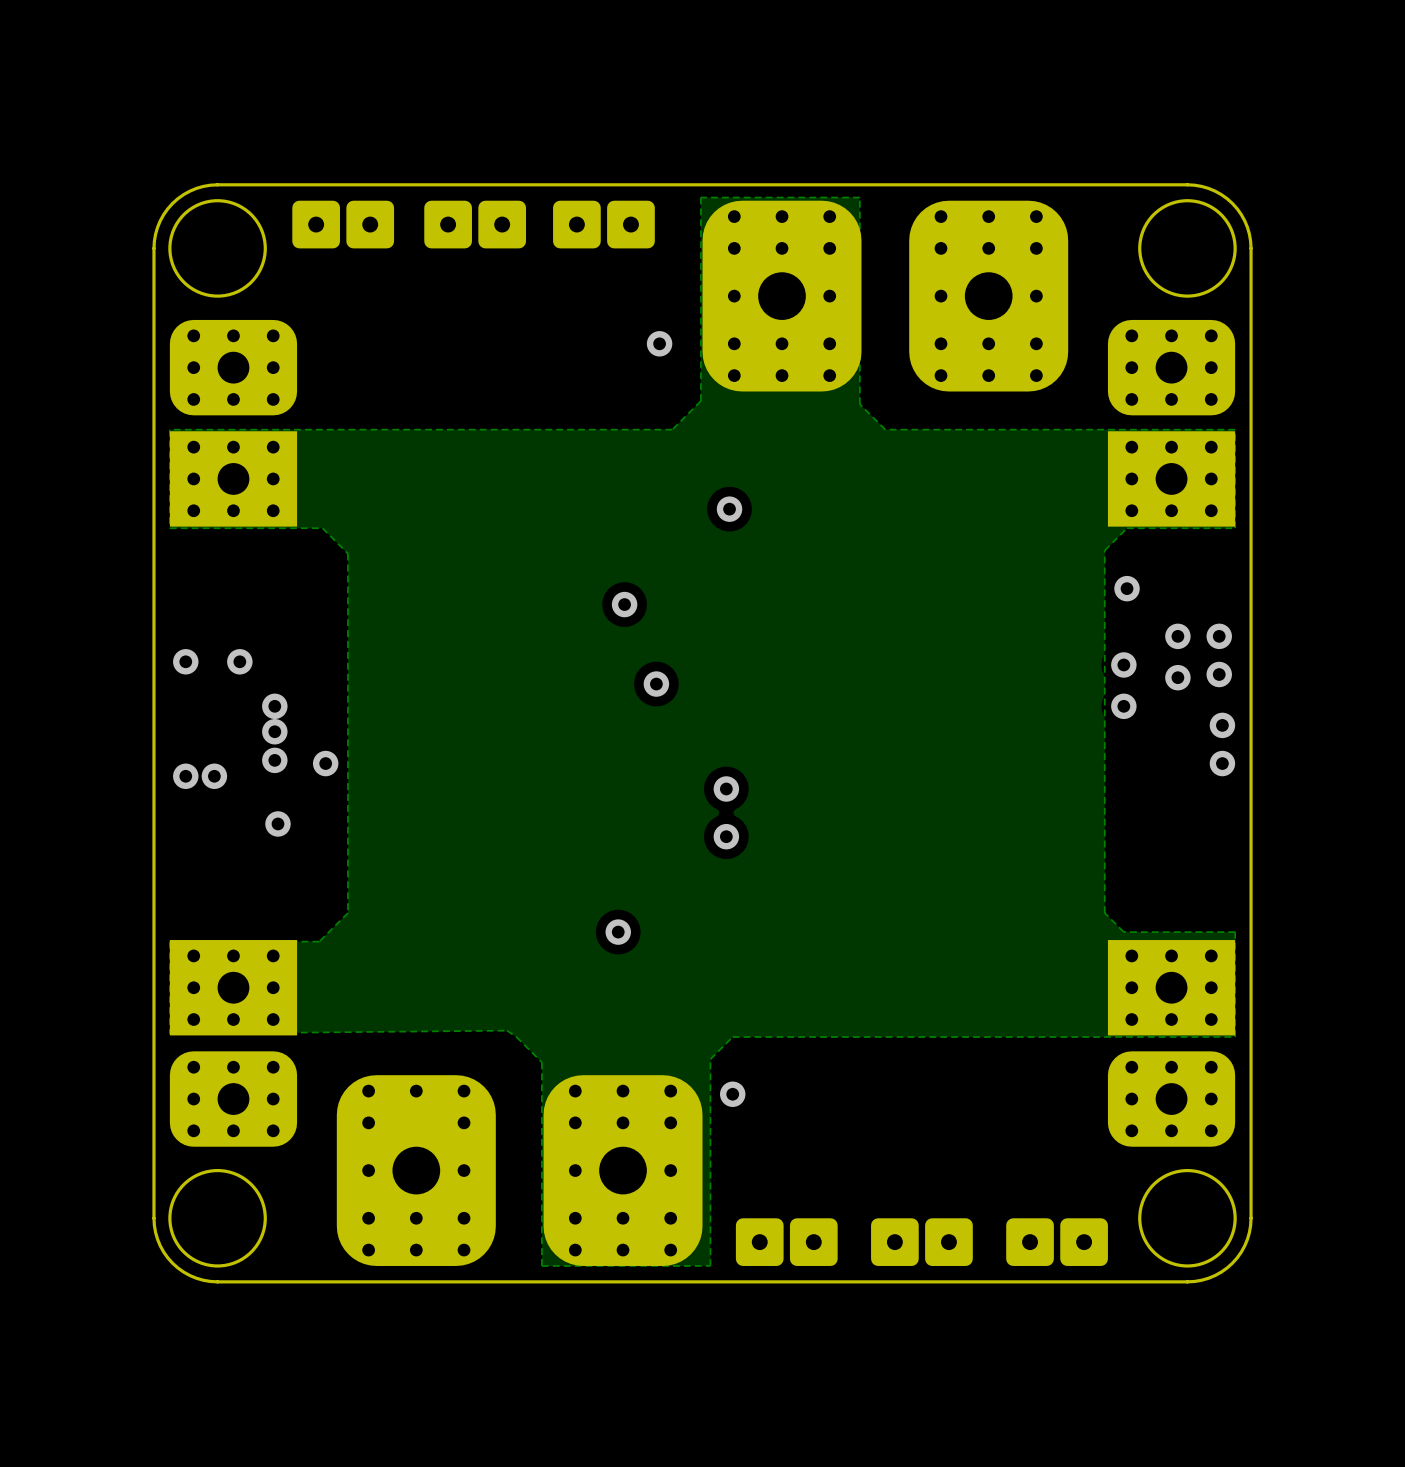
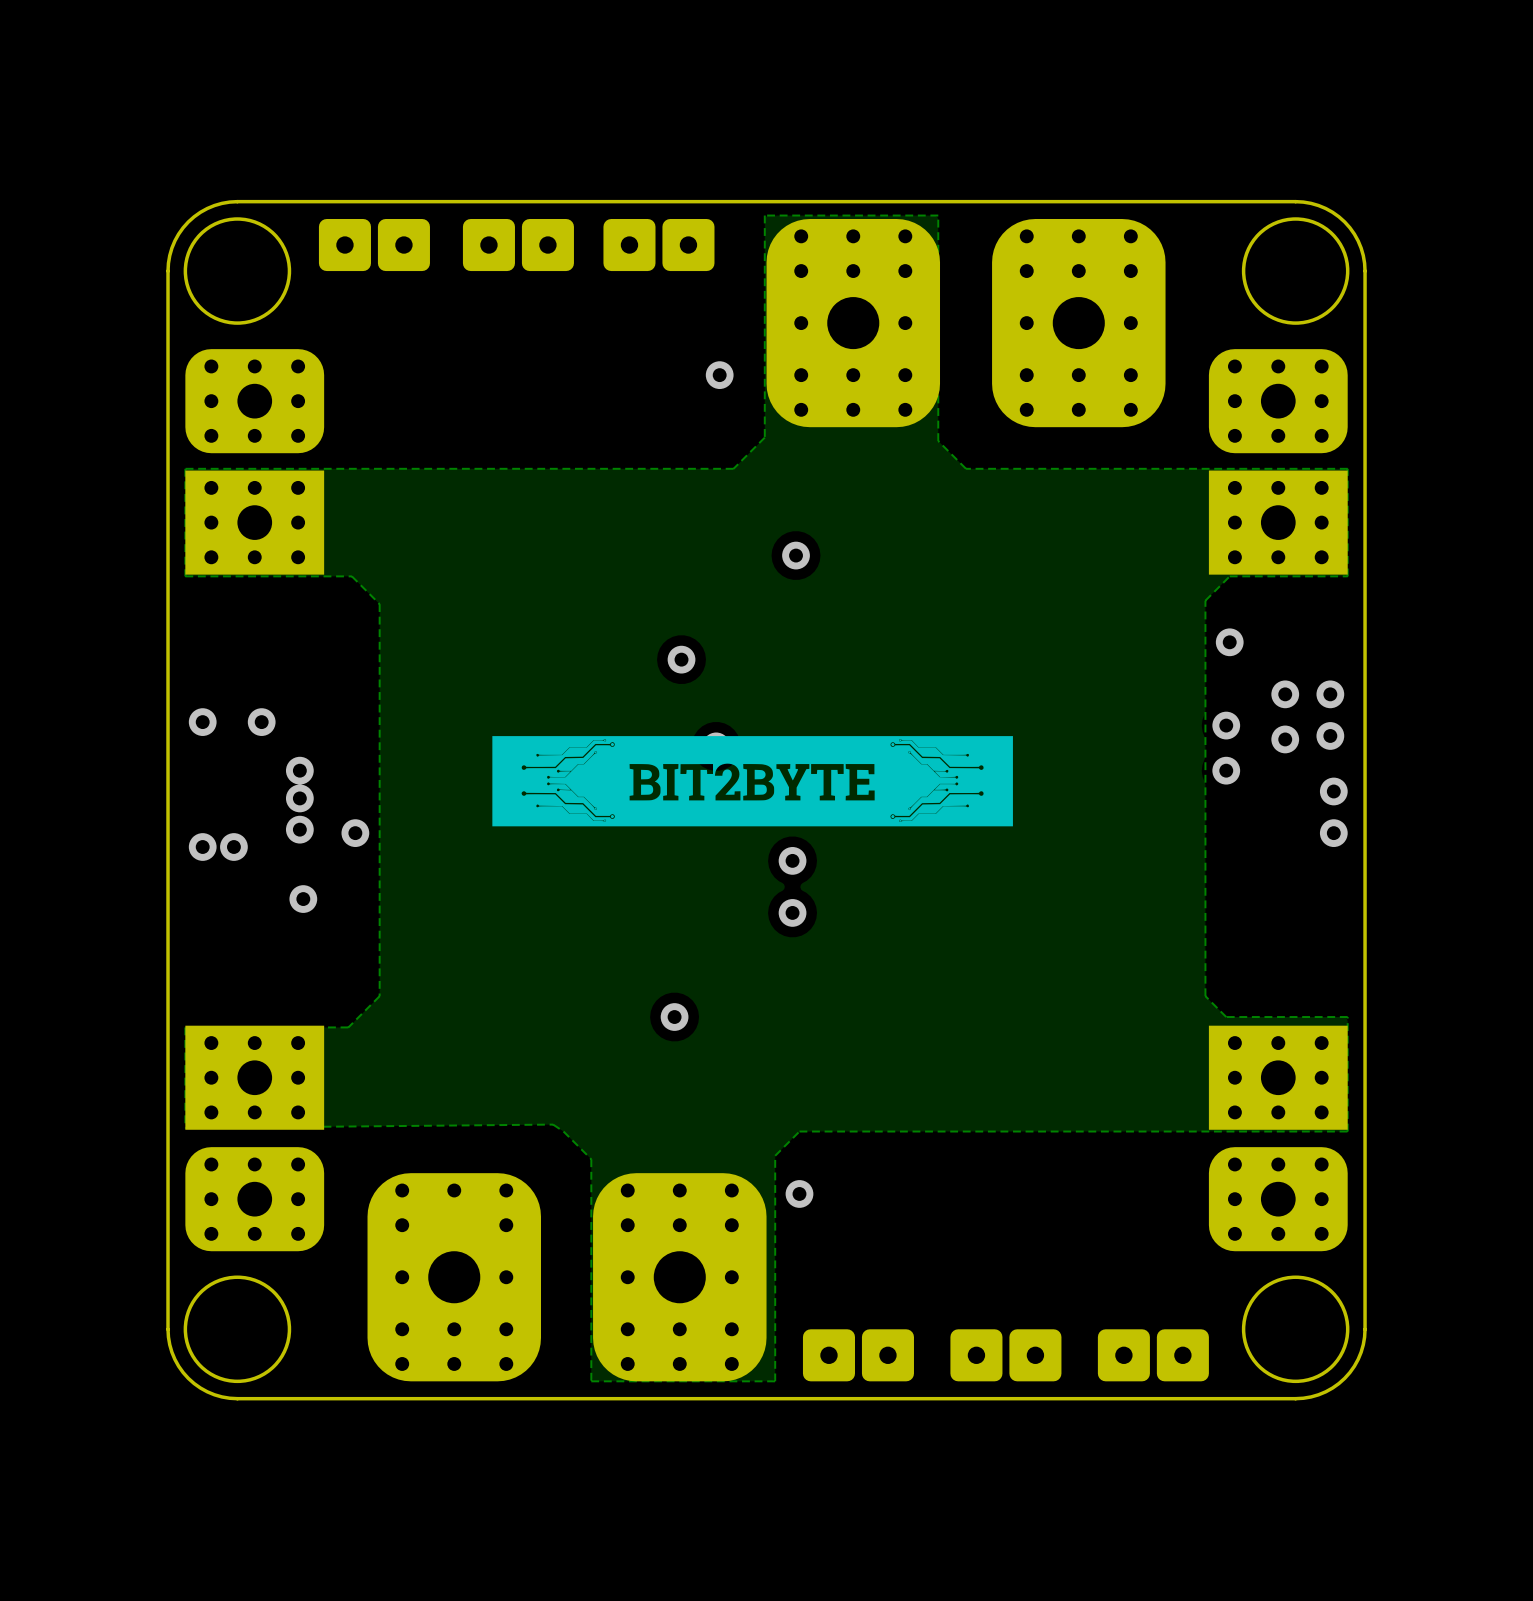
drawing: none -> [492, 736, 1013, 827]

